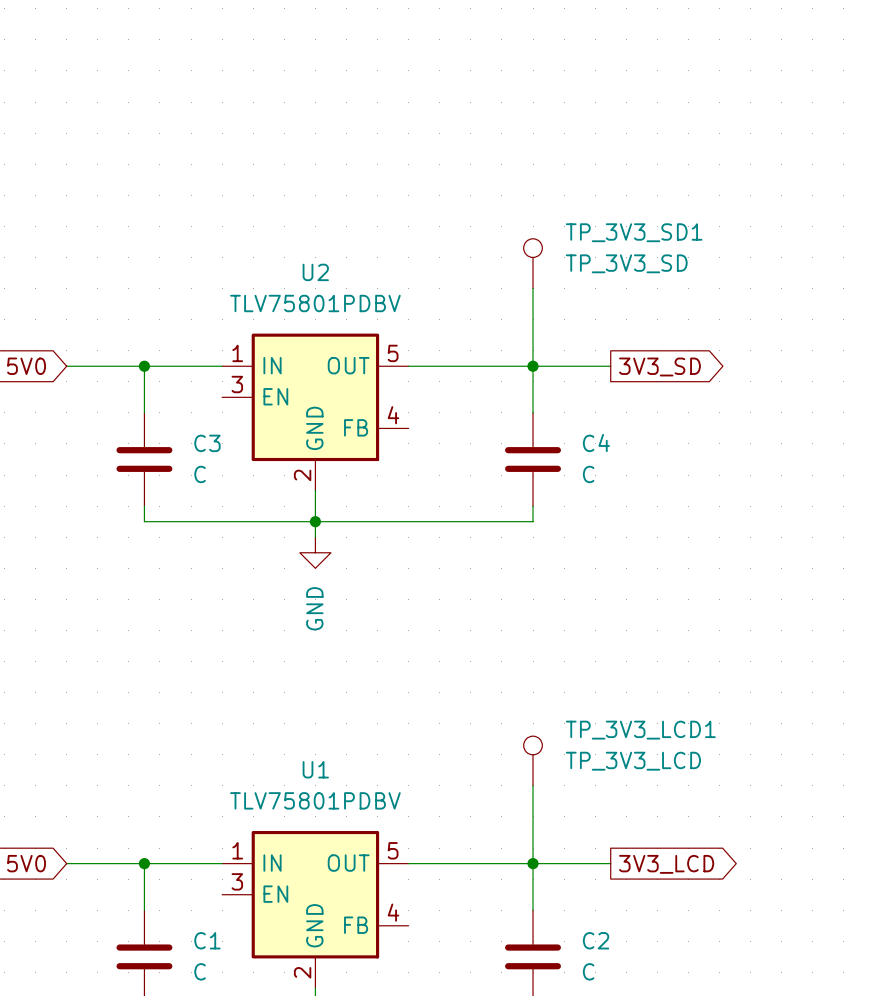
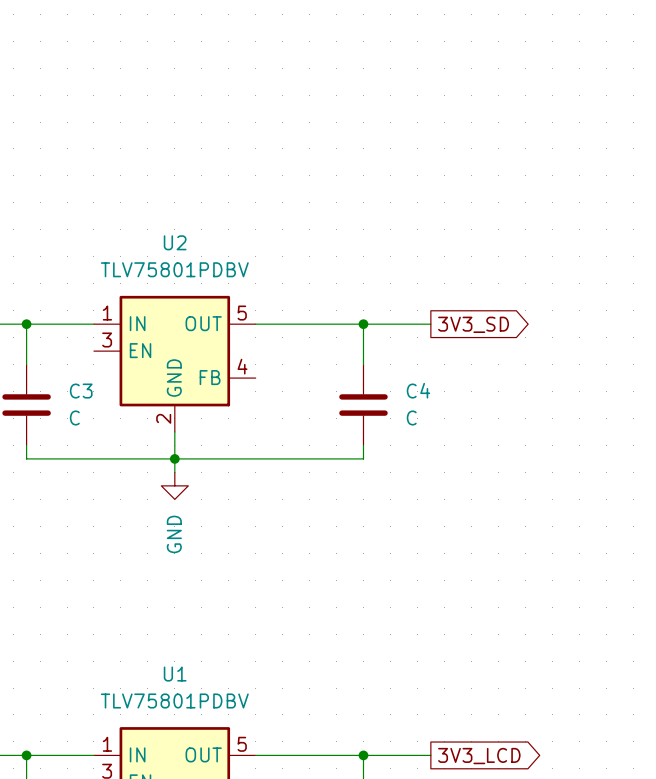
TP_3V3_SD1: TP_3V3_SD (533, 263) -> none
wire: (533, 288) (533, 366) -> none
TP_3V3_LCD1: TP_3V3_LCD (533, 761) -> none
wire: (533, 785) (533, 863) -> none

